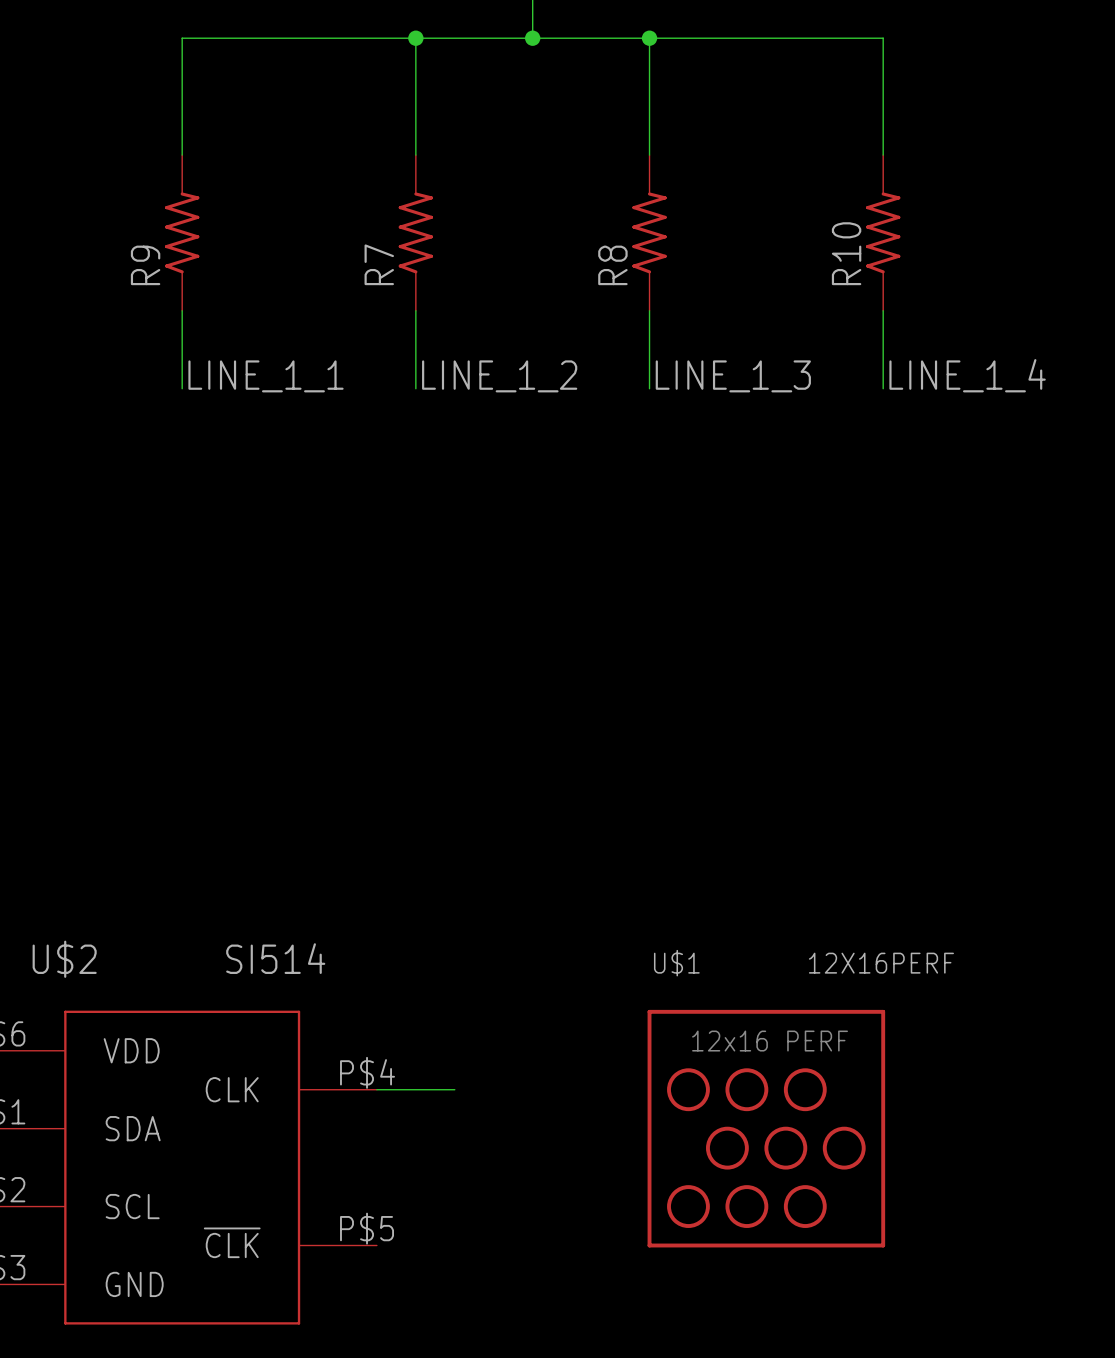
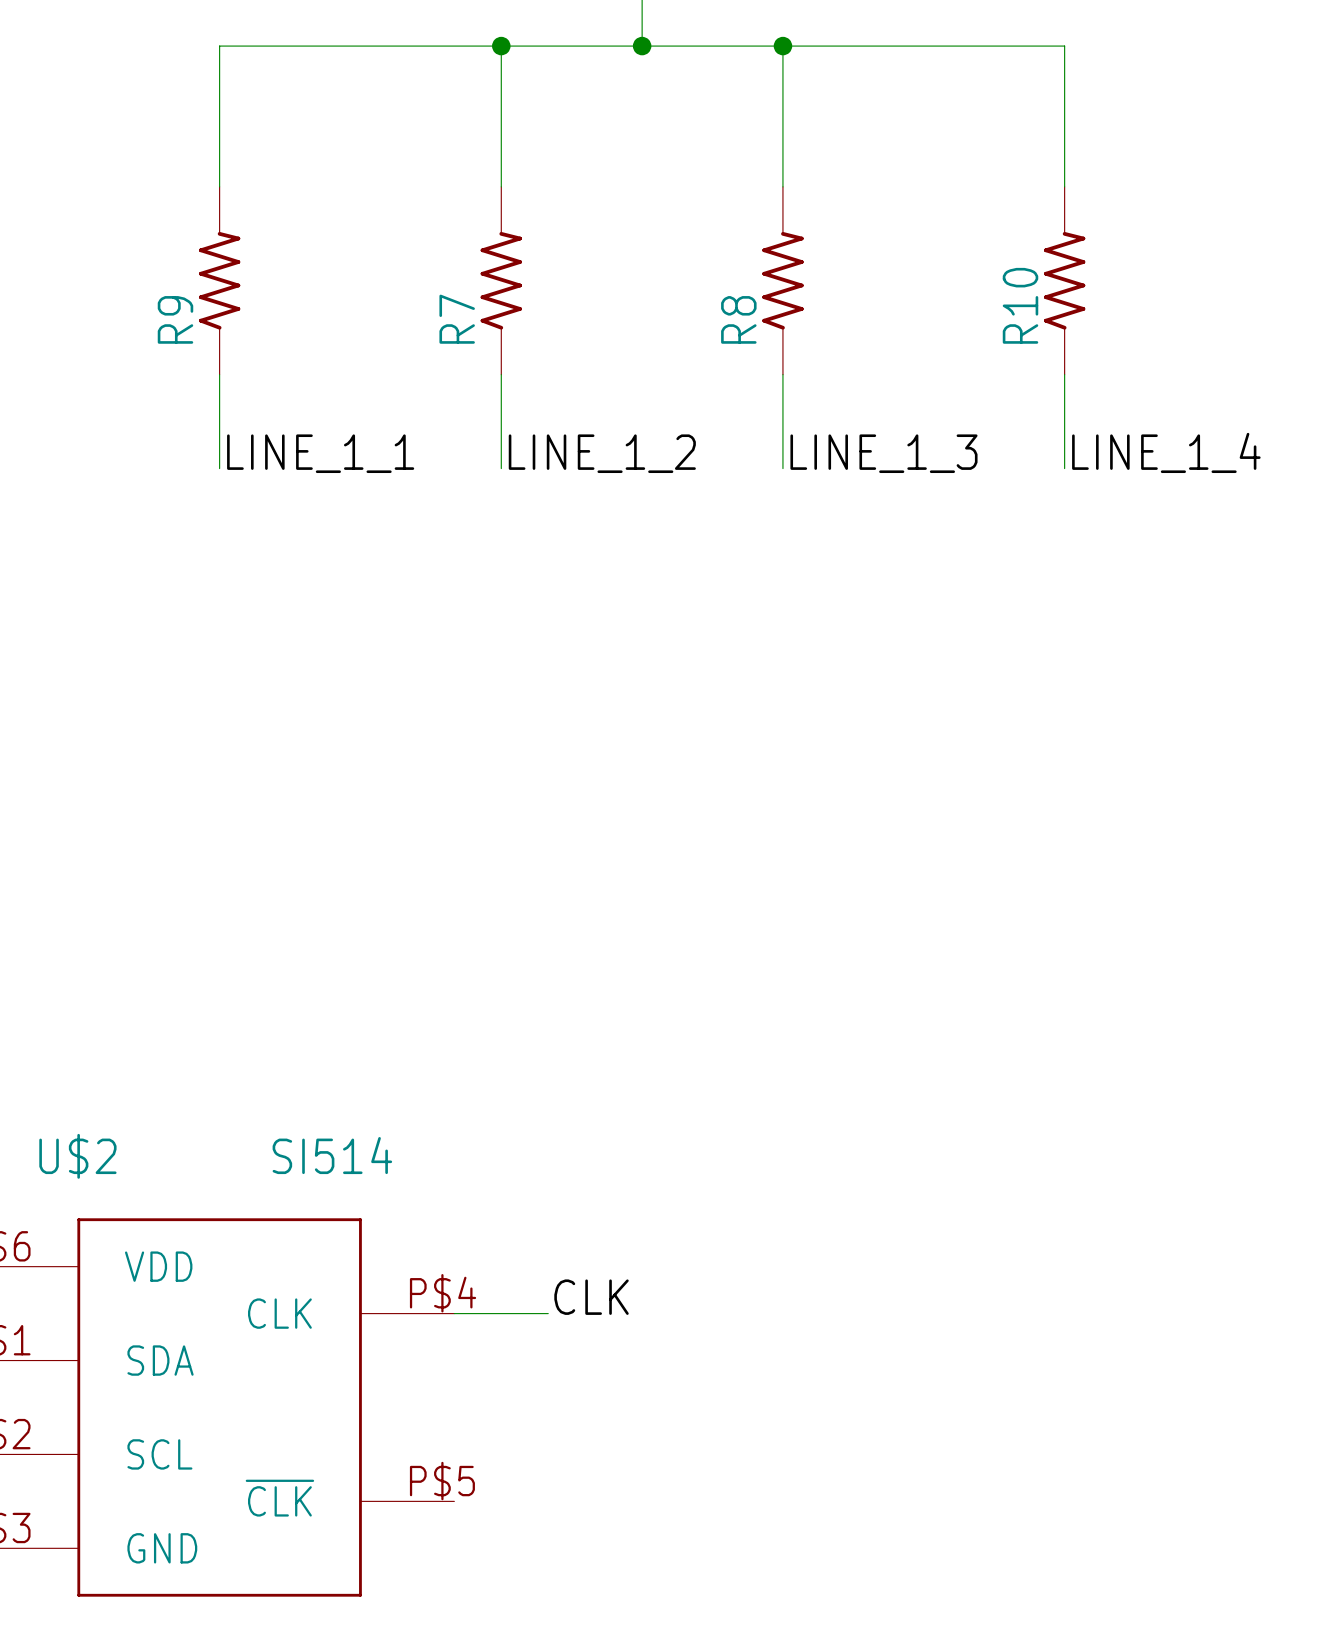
label: none -> CLK (591, 1297)
U$1: 12X16PERF (766, 1128) -> none

